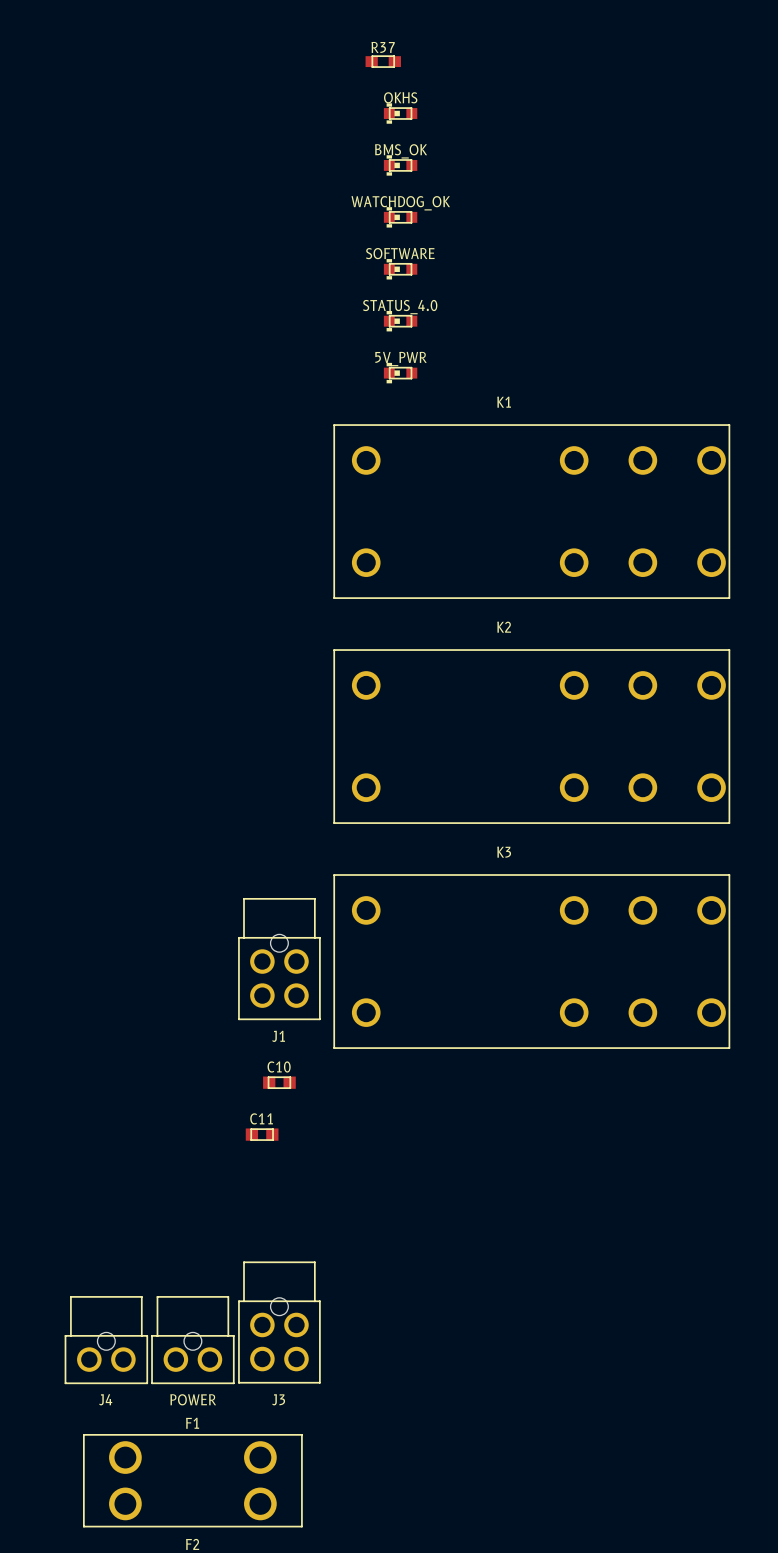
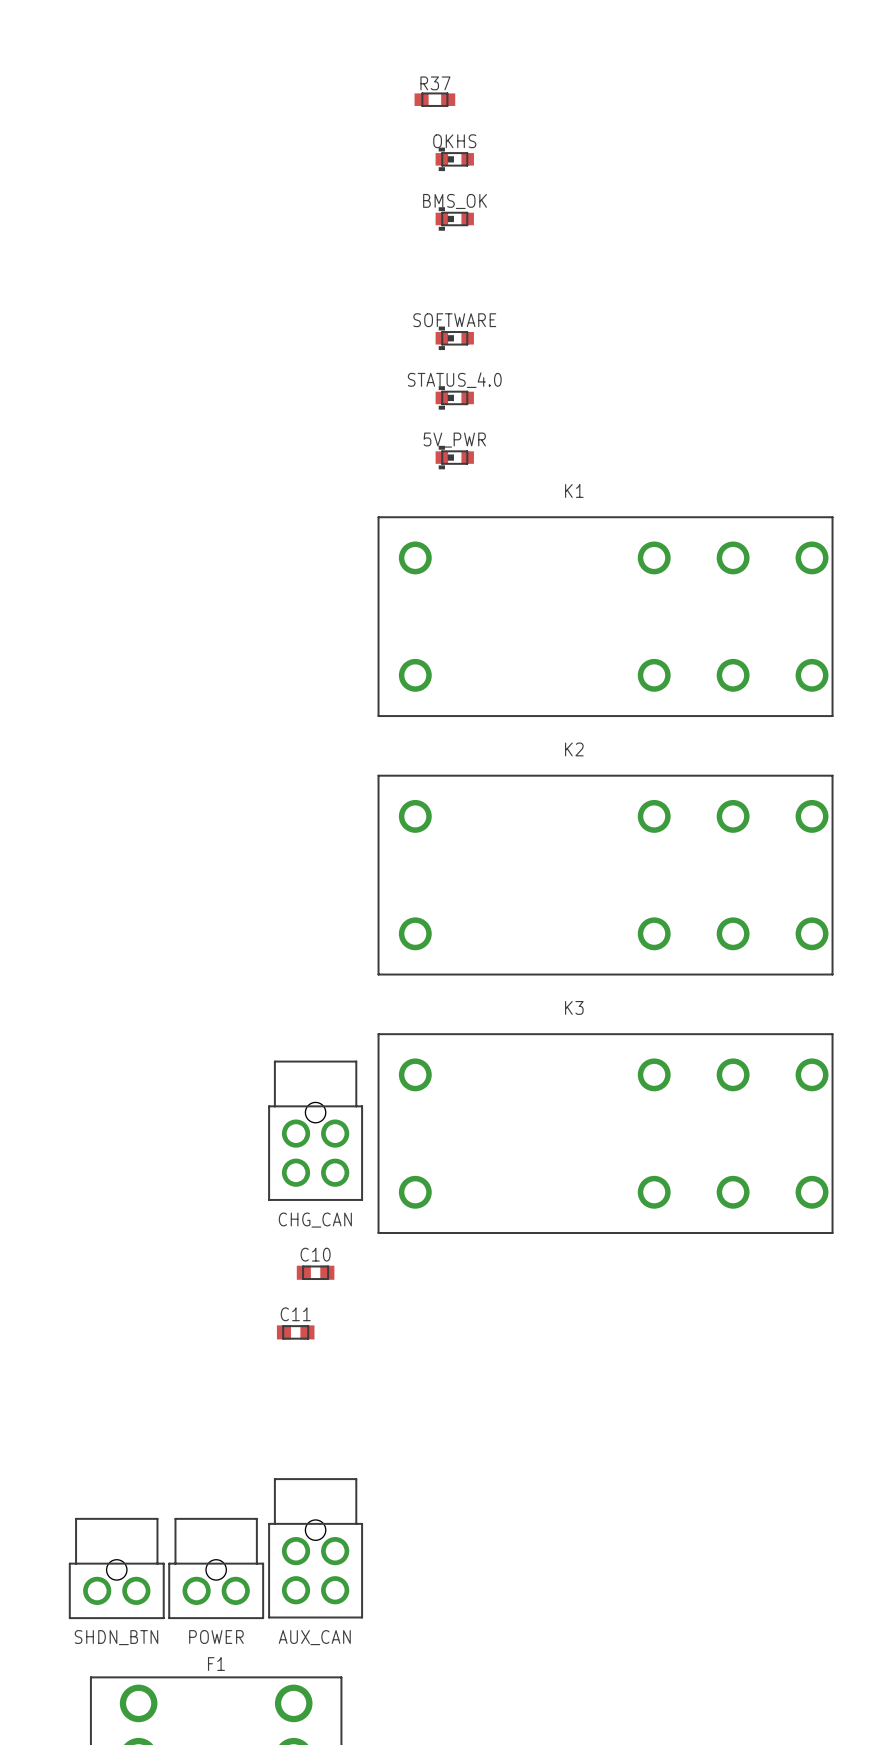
WATCHDOG_OK: (400, 217) -> none
J1 name: J1 (278, 1036) -> CHG_CAN (315, 1220)
J4 name: J4 (105, 1399) -> SHDN_BTN (116, 1637)
J3 name: J3 (278, 1399) -> AUX_CAN (314, 1637)

